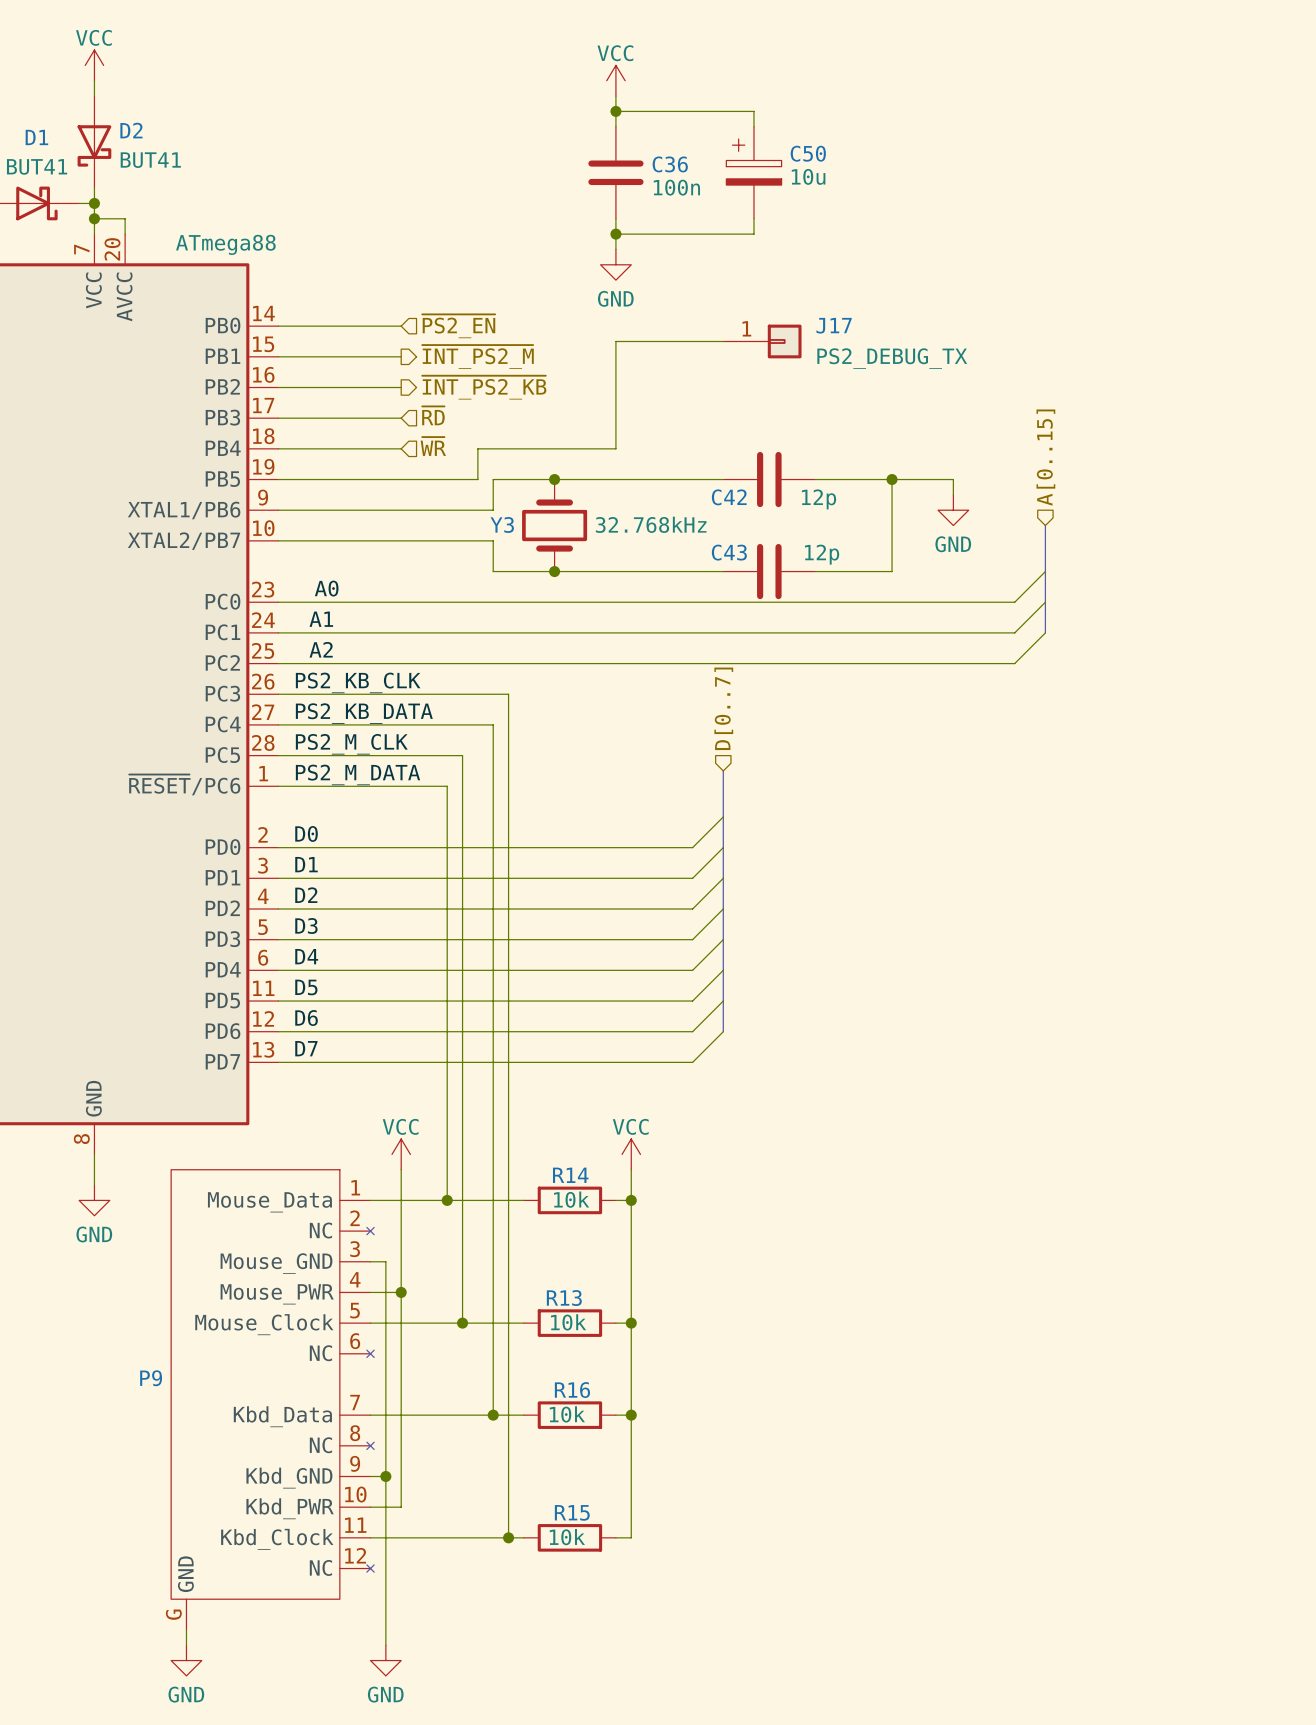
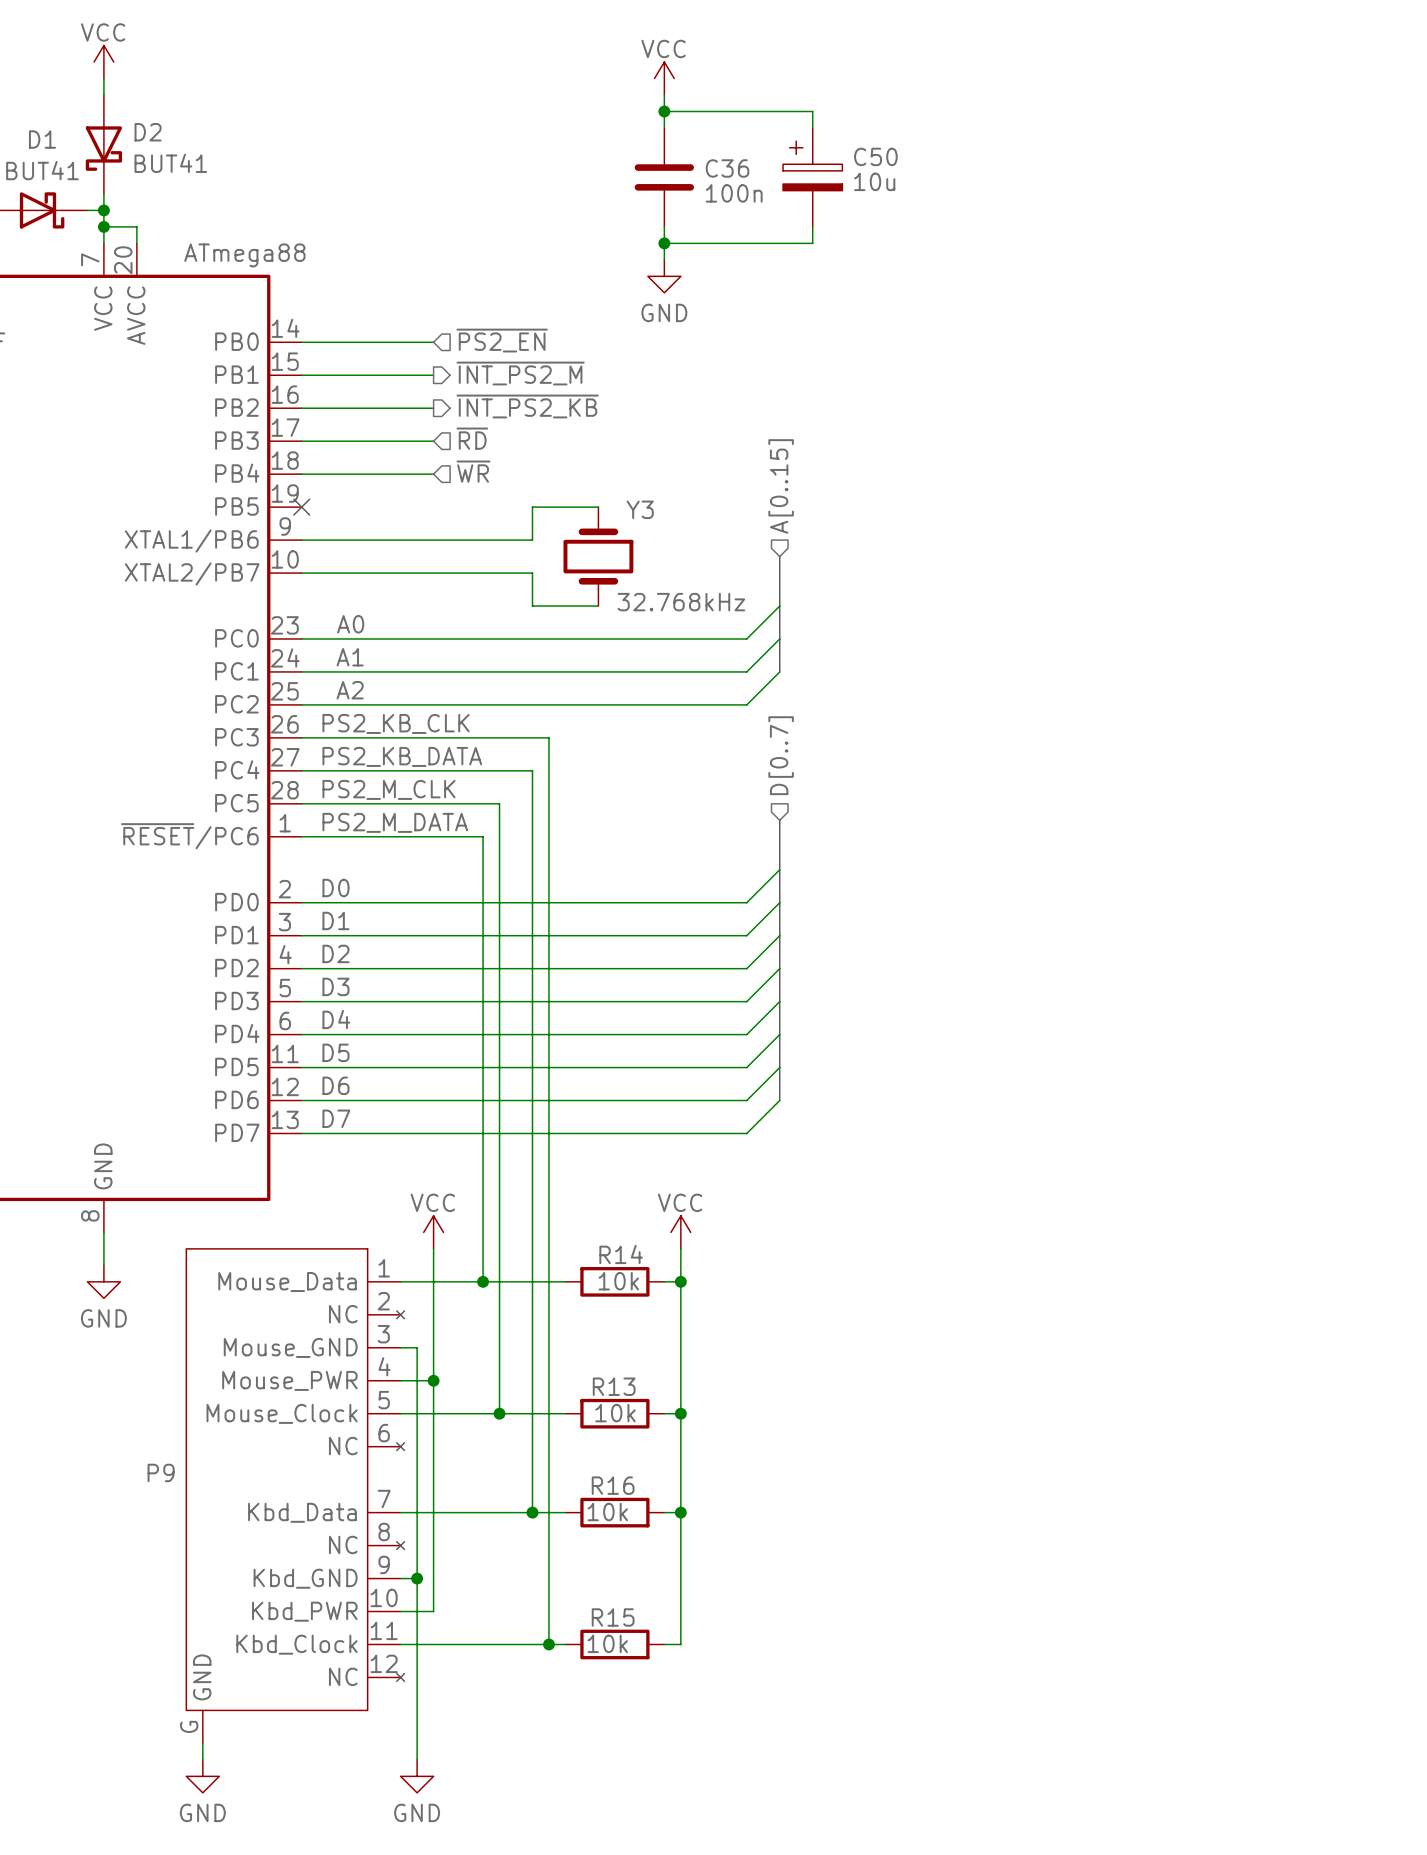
wire: (723, 341) (615, 341) (615, 448) (477, 448) (477, 479) (278, 479) -> none
J17: PS2_DEBUG_TX (762, 341) -> none
hierarchical label: none -> A[0..15] (781, 486)
hierarchical label: A[0..15] (1045, 457) -> none
no-connect mark: none -> (301, 507)
wire: (554, 479) (723, 479) -> none
junction: (554, 479) -> none
C42: 12p (769, 479) -> none
wire: (815, 479) (953, 479) (953, 494) -> none
wire: (892, 479) (892, 571) (815, 571) -> none
junction: (892, 479) -> none
power symbol: GND (953, 510) -> none
Y3 name position: Y3 (502, 524) -> Y3 (640, 509)
Y3 value position: 32.768kHz (651, 524) -> 32.768kHz (681, 602)
bus: none -> (779, 556) (779, 671)
bus: (1045, 525) (1045, 632) -> none
wire: (554, 571) (723, 571) -> (746, 638) (779, 606)
junction: (554, 571) -> none
C43: 12p (769, 571) -> none
wire: (1045, 571) (1014, 602) (692, 602) -> none
wire: (1045, 602) (1014, 632) (692, 632) -> (779, 638) (746, 671)
wire: (1045, 632) (1014, 663) (692, 663) -> (779, 671) (746, 704)

